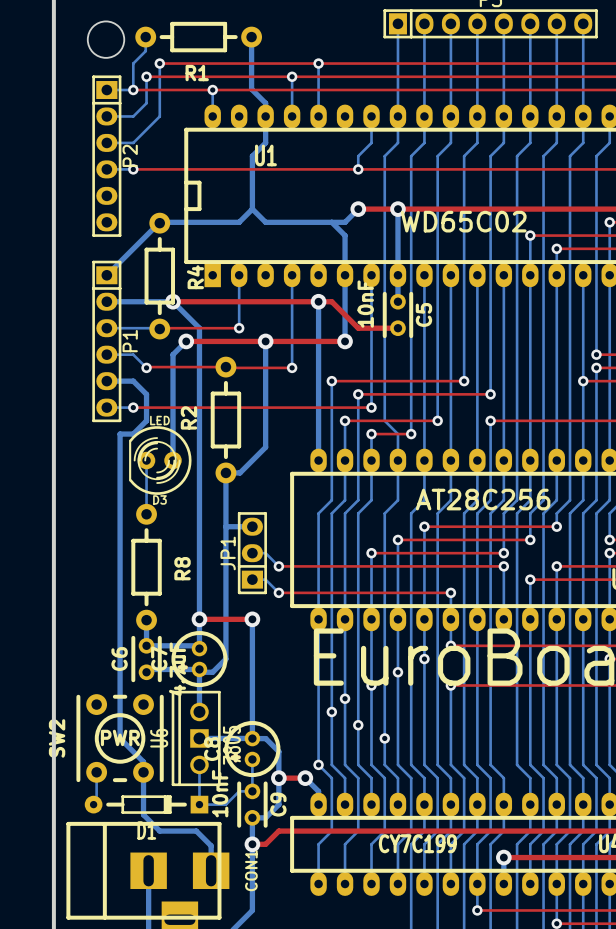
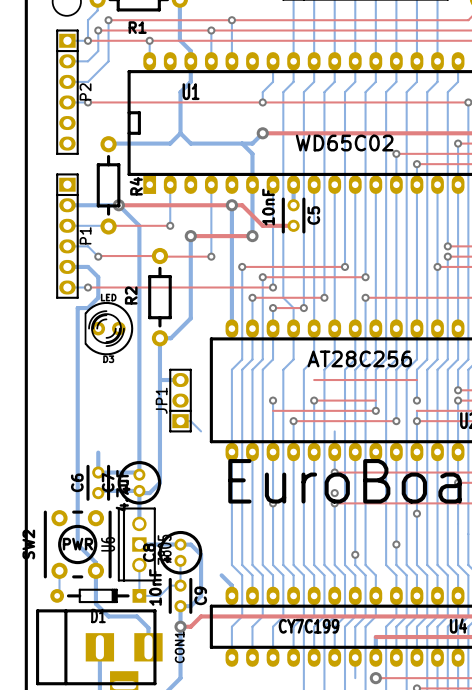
bottom track: (397, 209) (397, 275) -> none
via: (397, 209) -> none
bottom track: (159, 223) (106, 275) -> none
bottom track: (186, 341) (173, 354) (173, 460) -> none
top track: (186, 341) (265, 341) -> none
via: (186, 341) -> none
bottom track: (146, 460) (146, 514) -> none
bottom track: (424, 526) (424, 553) -> (416, 380) (416, 400)
via: (424, 526) -> none
via: (556, 526) -> none
bottom track: (397, 539) (397, 579) -> none
top track: (397, 539) (530, 539) -> none
via: (397, 539) -> none
via: (530, 539) -> none
bottom track: (252, 553) (265, 553) (278, 566) -> none
top track: (371, 553) (424, 553) -> none
via: none -> (314, 400)
via: (503, 553) -> none
via: none -> (416, 400)
top track: (278, 566) (371, 566) -> none
via: (278, 566) -> none
bottom track: (503, 566) (503, 619) -> (375, 410) (375, 400)
via: (556, 566) -> none
R8: (146, 567) -> none
via: none -> (293, 421)
bottom track: (530, 579) (530, 619) -> (396, 421) (396, 390)
top track: (530, 579) (556, 579) -> (396, 421) (293, 421)
via: none -> (416, 421)
top track: (278, 592) (450, 592) -> none
via: (278, 592) -> none
via: (450, 592) -> none
top track: (199, 619) (252, 619) -> none
via: (199, 619) -> none
bottom track: (252, 619) (252, 738) -> none
via: (252, 619) -> none
via: (424, 659) -> none
via: (397, 672) -> none
via: none -> (334, 493)
via: (345, 698) -> none
via: none -> (416, 513)
via: (331, 711) -> none
via: (358, 725) -> none
via: (384, 738) -> none
via: none -> (396, 544)
via: none -> (355, 554)
via: (318, 764) -> none
top track: (278, 778) (305, 778) -> none
via: (278, 778) -> none
via: (305, 778) -> none
via position: (503, 857) -> (375, 678)
bottom track: (556, 884) (556, 923) -> none
top track: (477, 910) (503, 910) -> none
via: (477, 910) -> none

